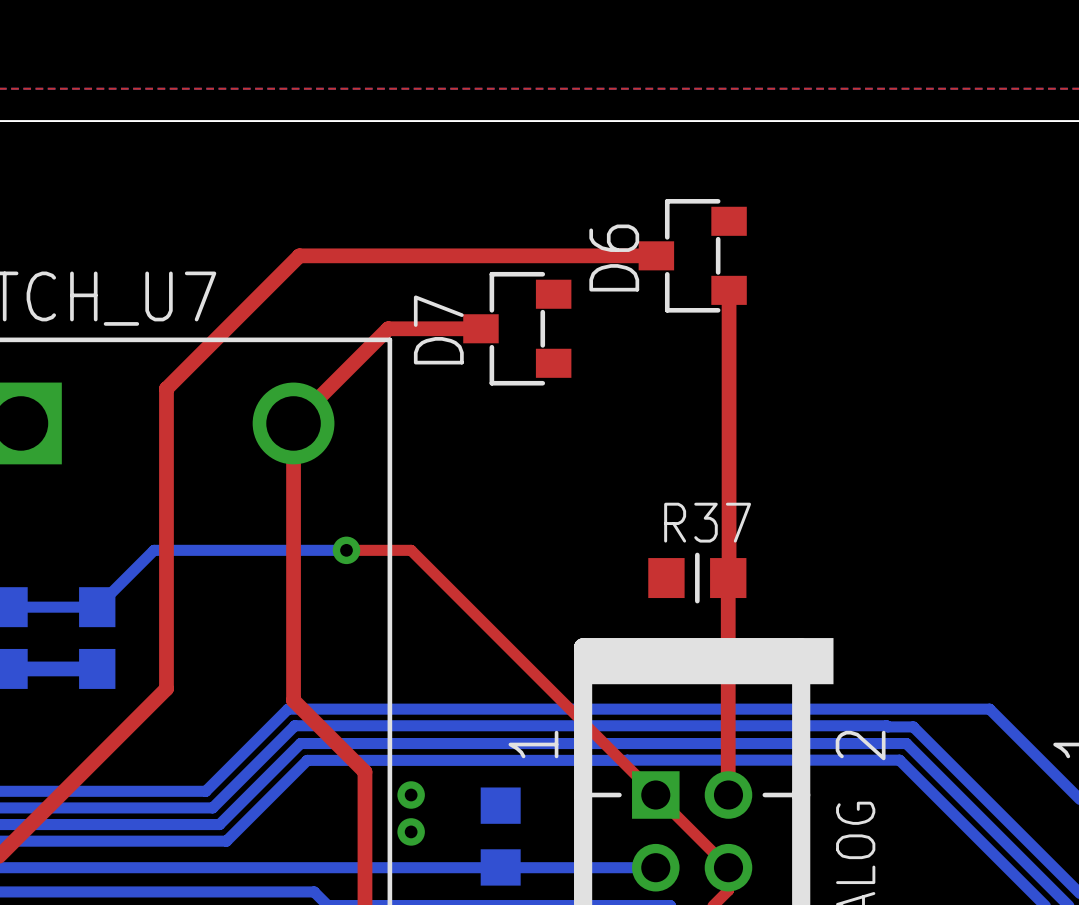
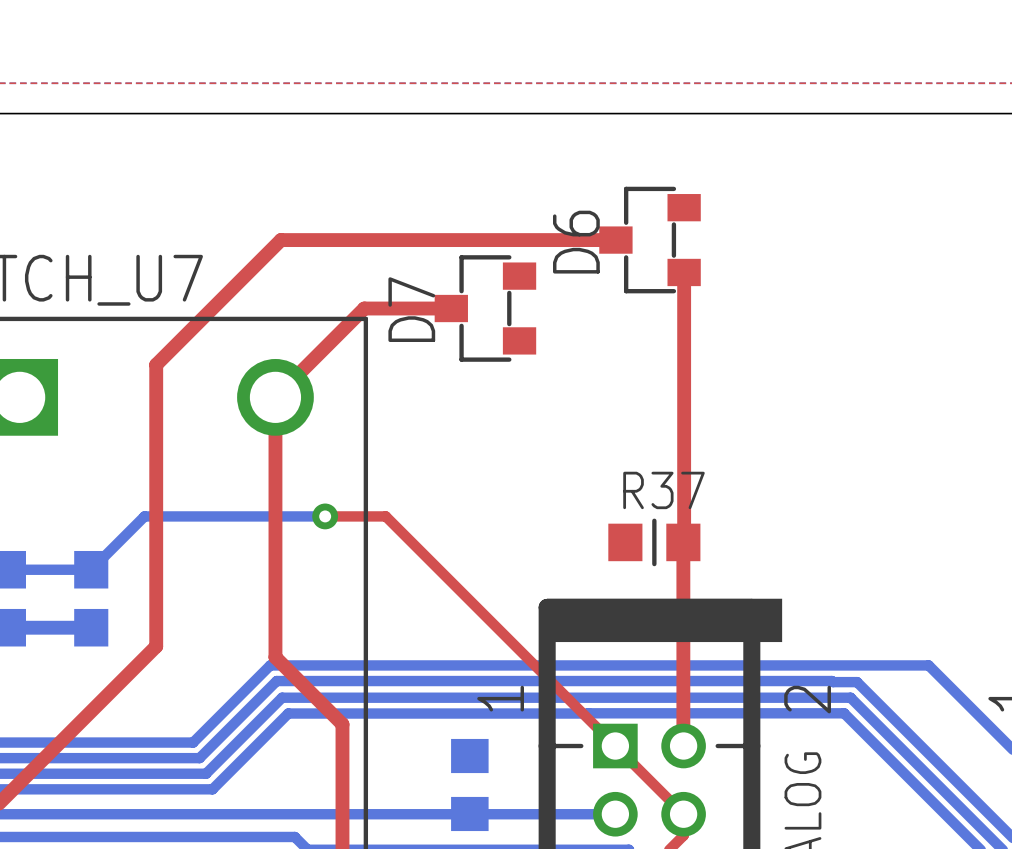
via: (411, 795) -> none
via: (411, 831) -> none

